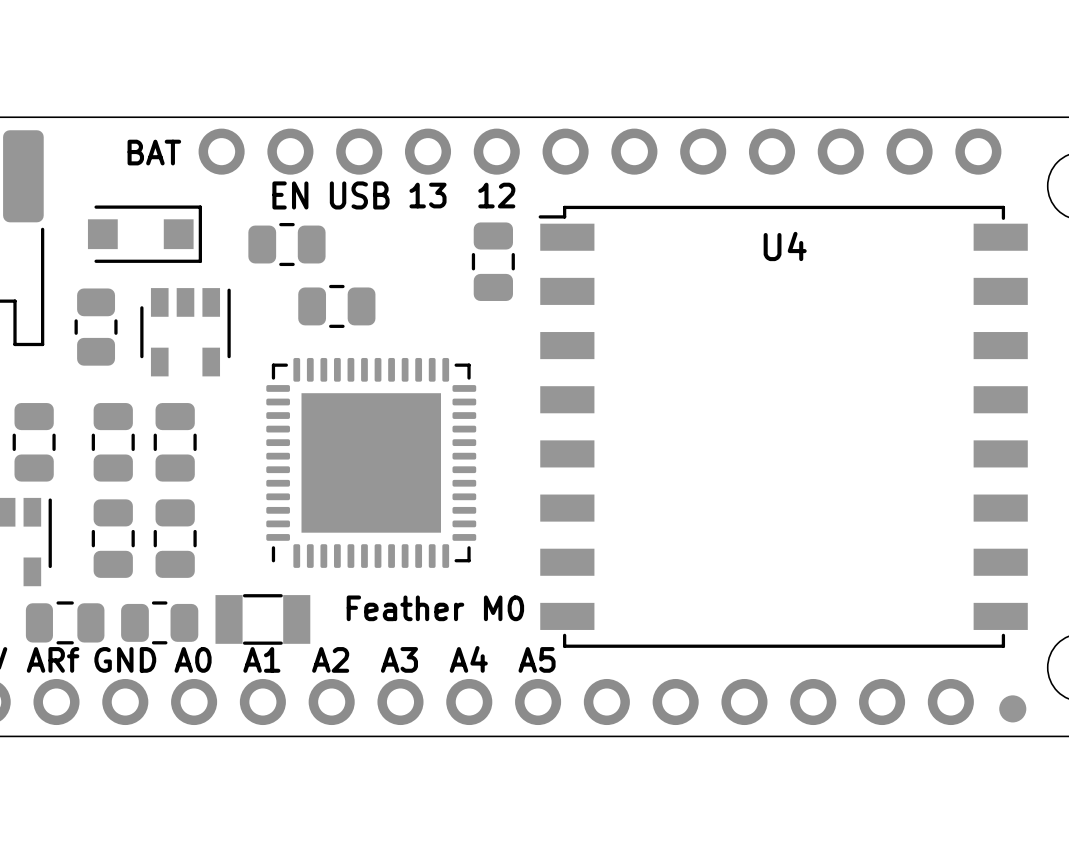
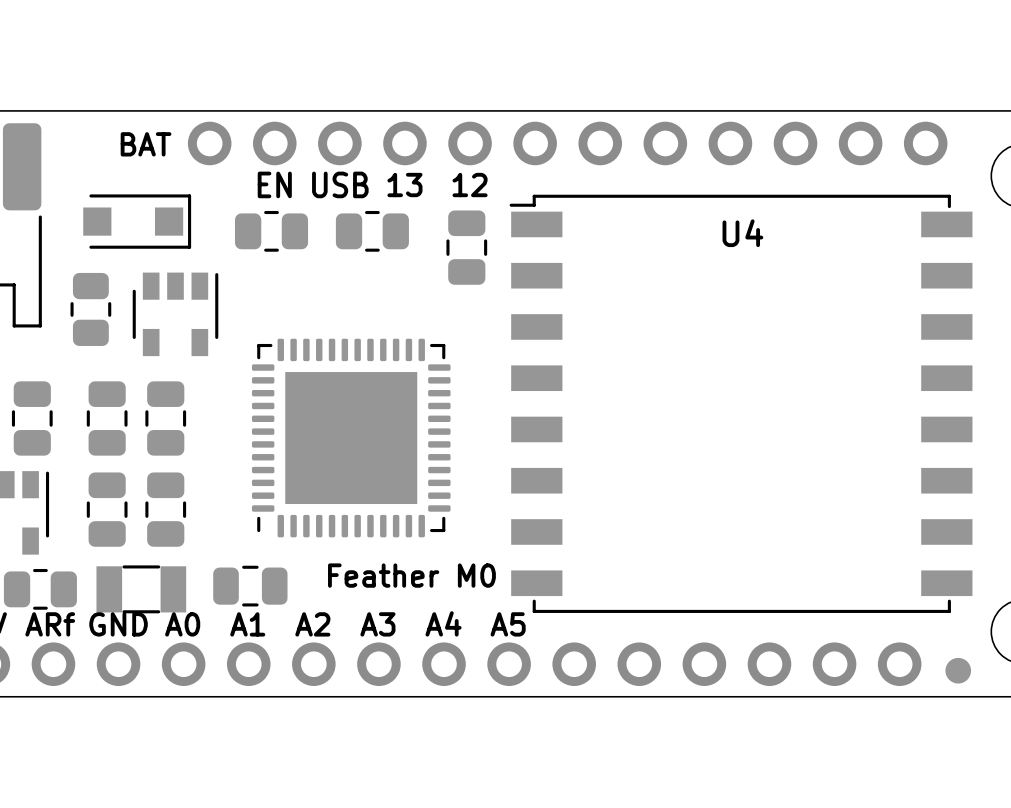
part position: (336, 306) -> (372, 231)
part footprint: [215, 594, 311, 645] -> [213, 565, 288, 607]
part footprint: [25, 601, 105, 645] -> [3, 568, 77, 610]
part footprint: [121, 601, 199, 645] -> [96, 565, 187, 614]

